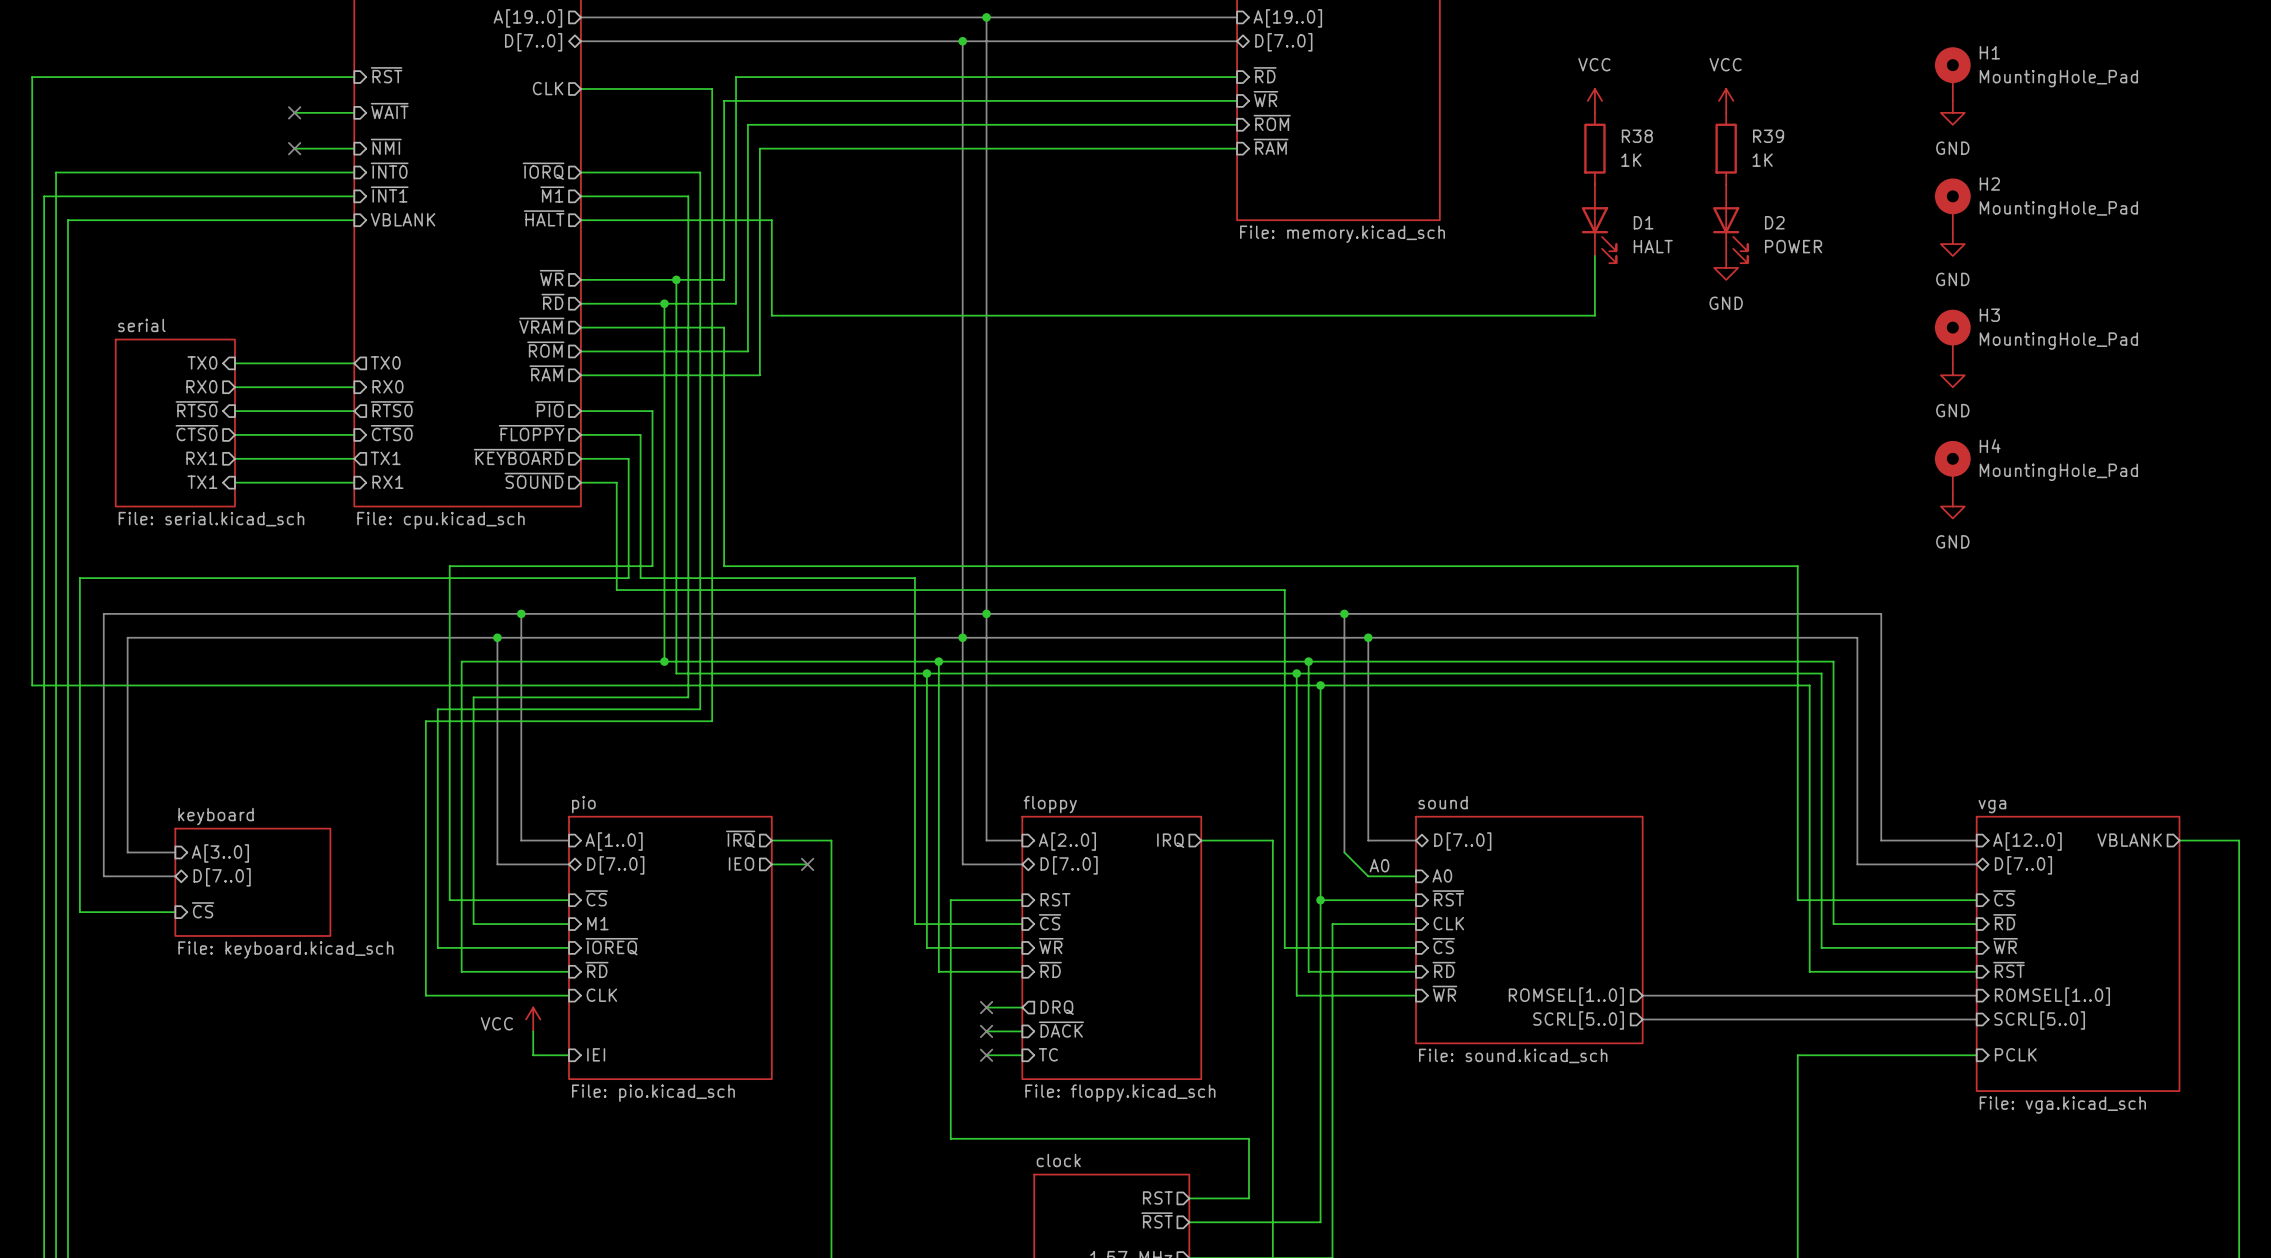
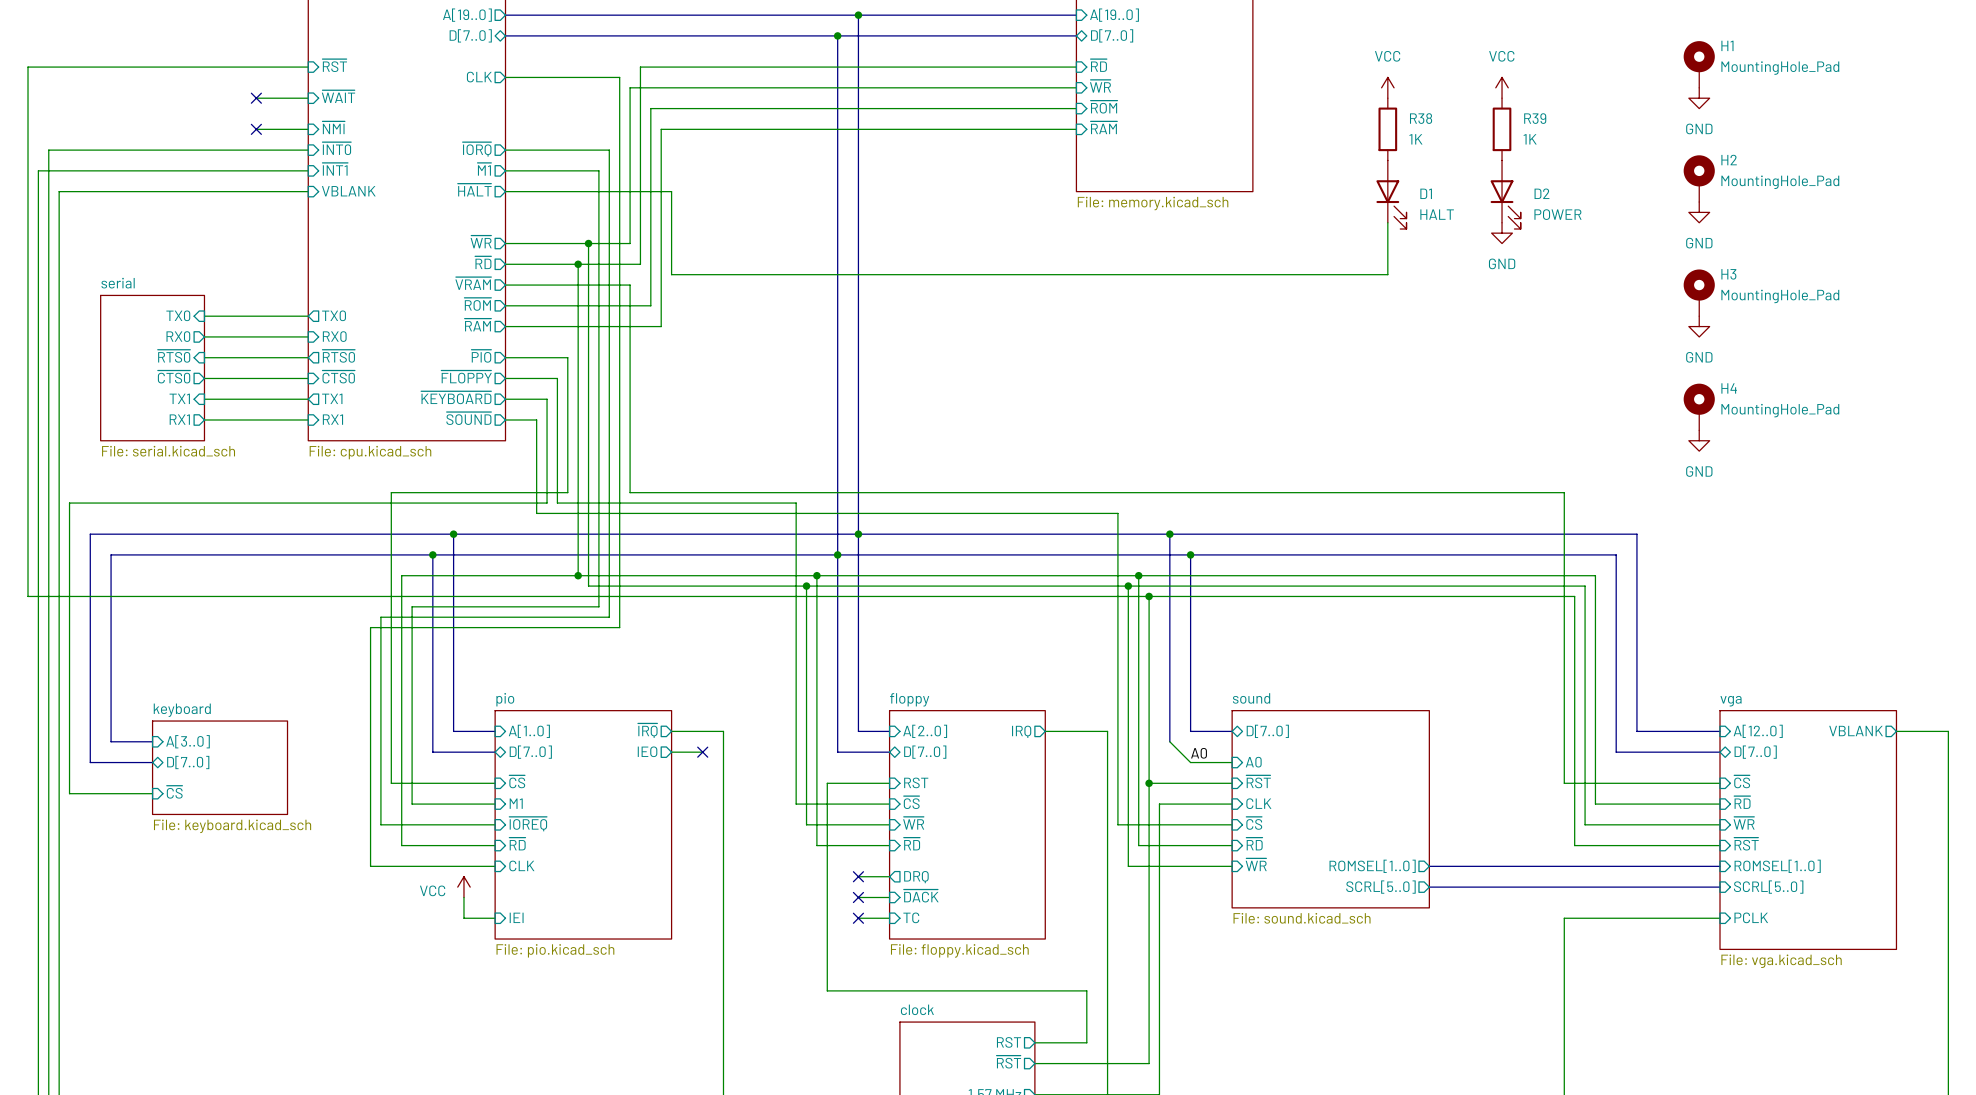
sheet pin shape: output (201, 458) -> input (179, 398)
sheet pin: RX1 (201, 458) -> TX1 (179, 398)
sheet pin shape: input (202, 482) -> output (179, 419)
sheet pin: TX1 (202, 482) -> RX1 (179, 419)

